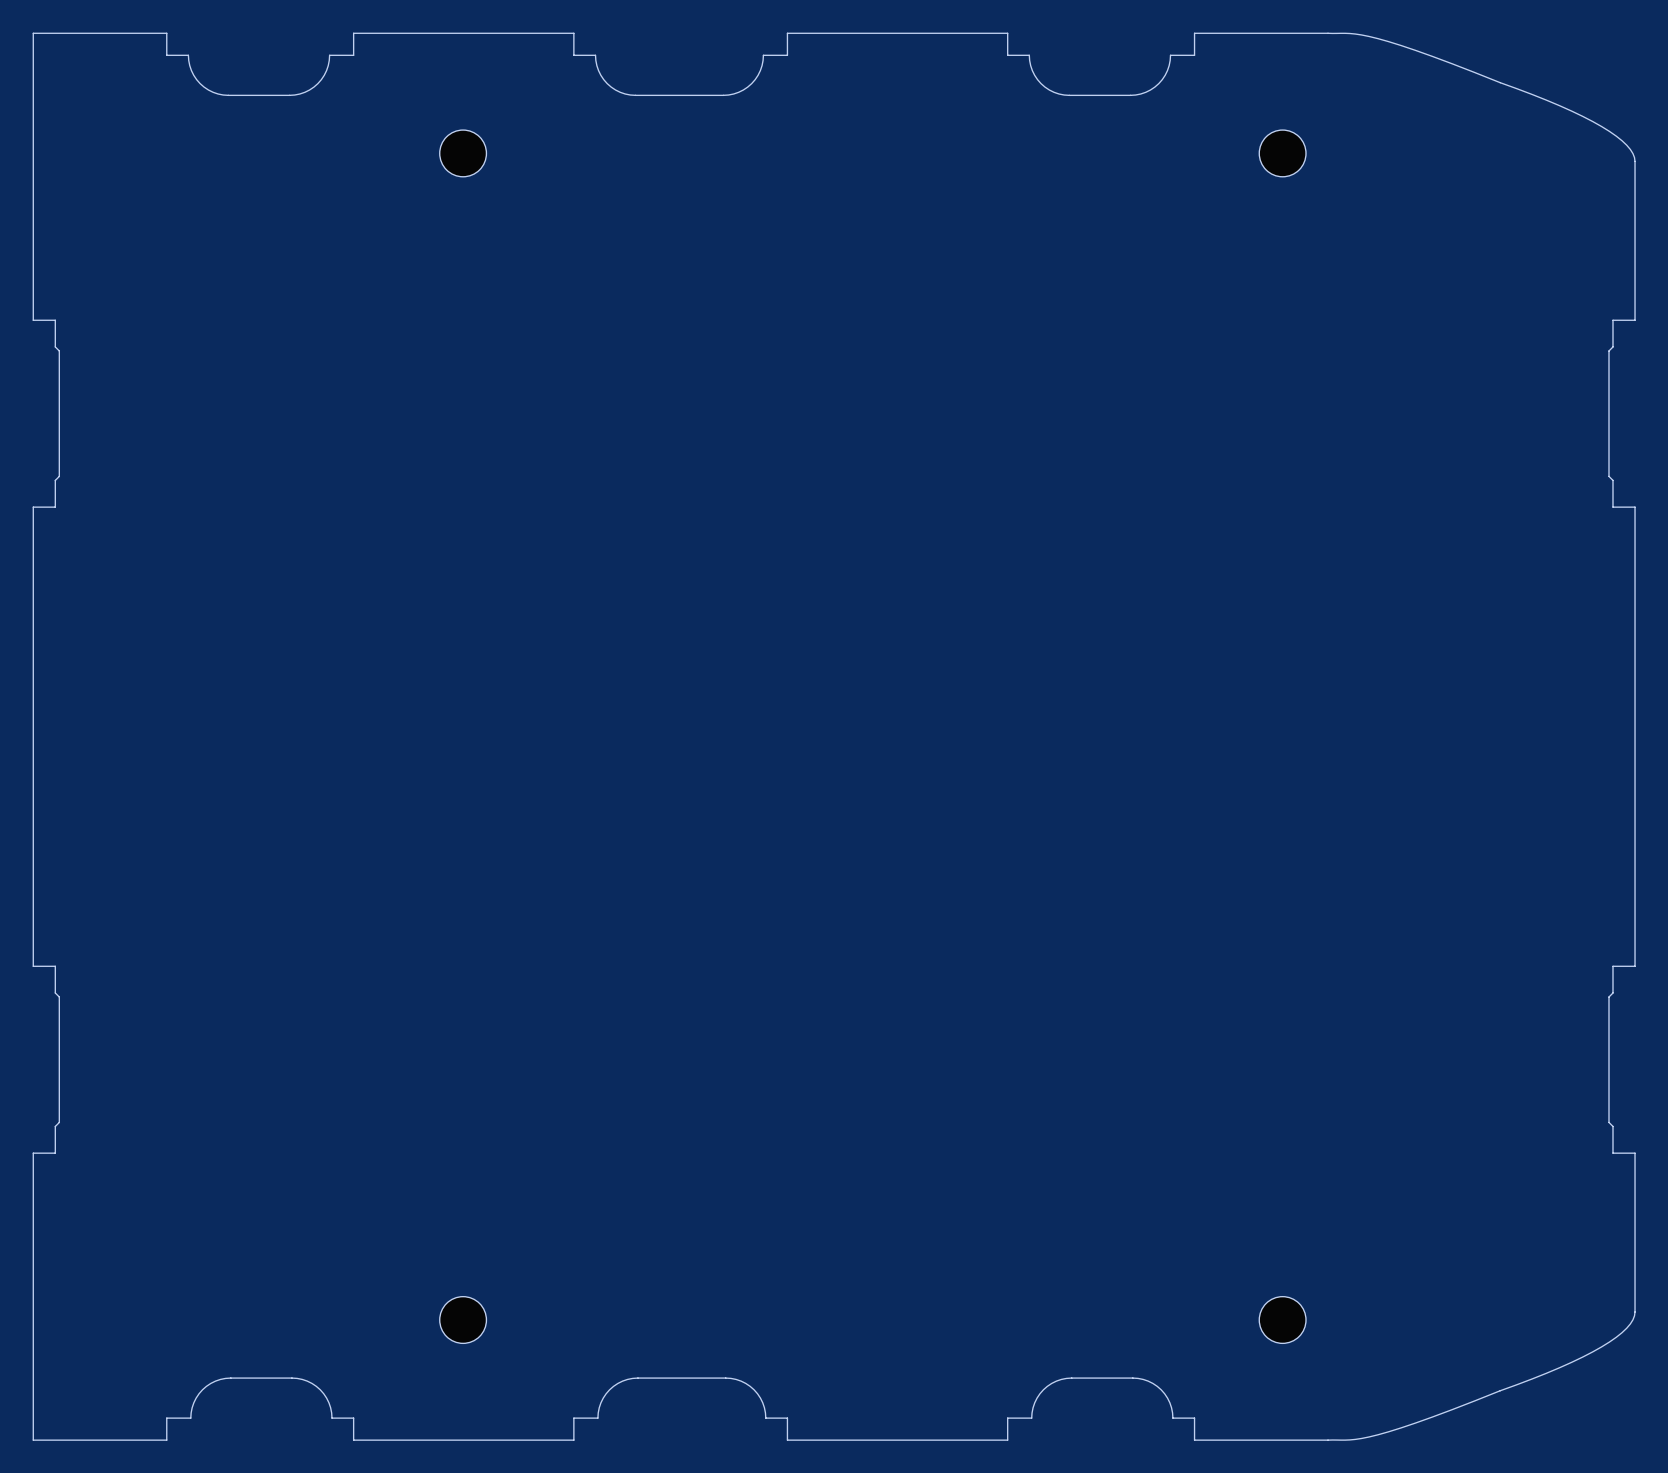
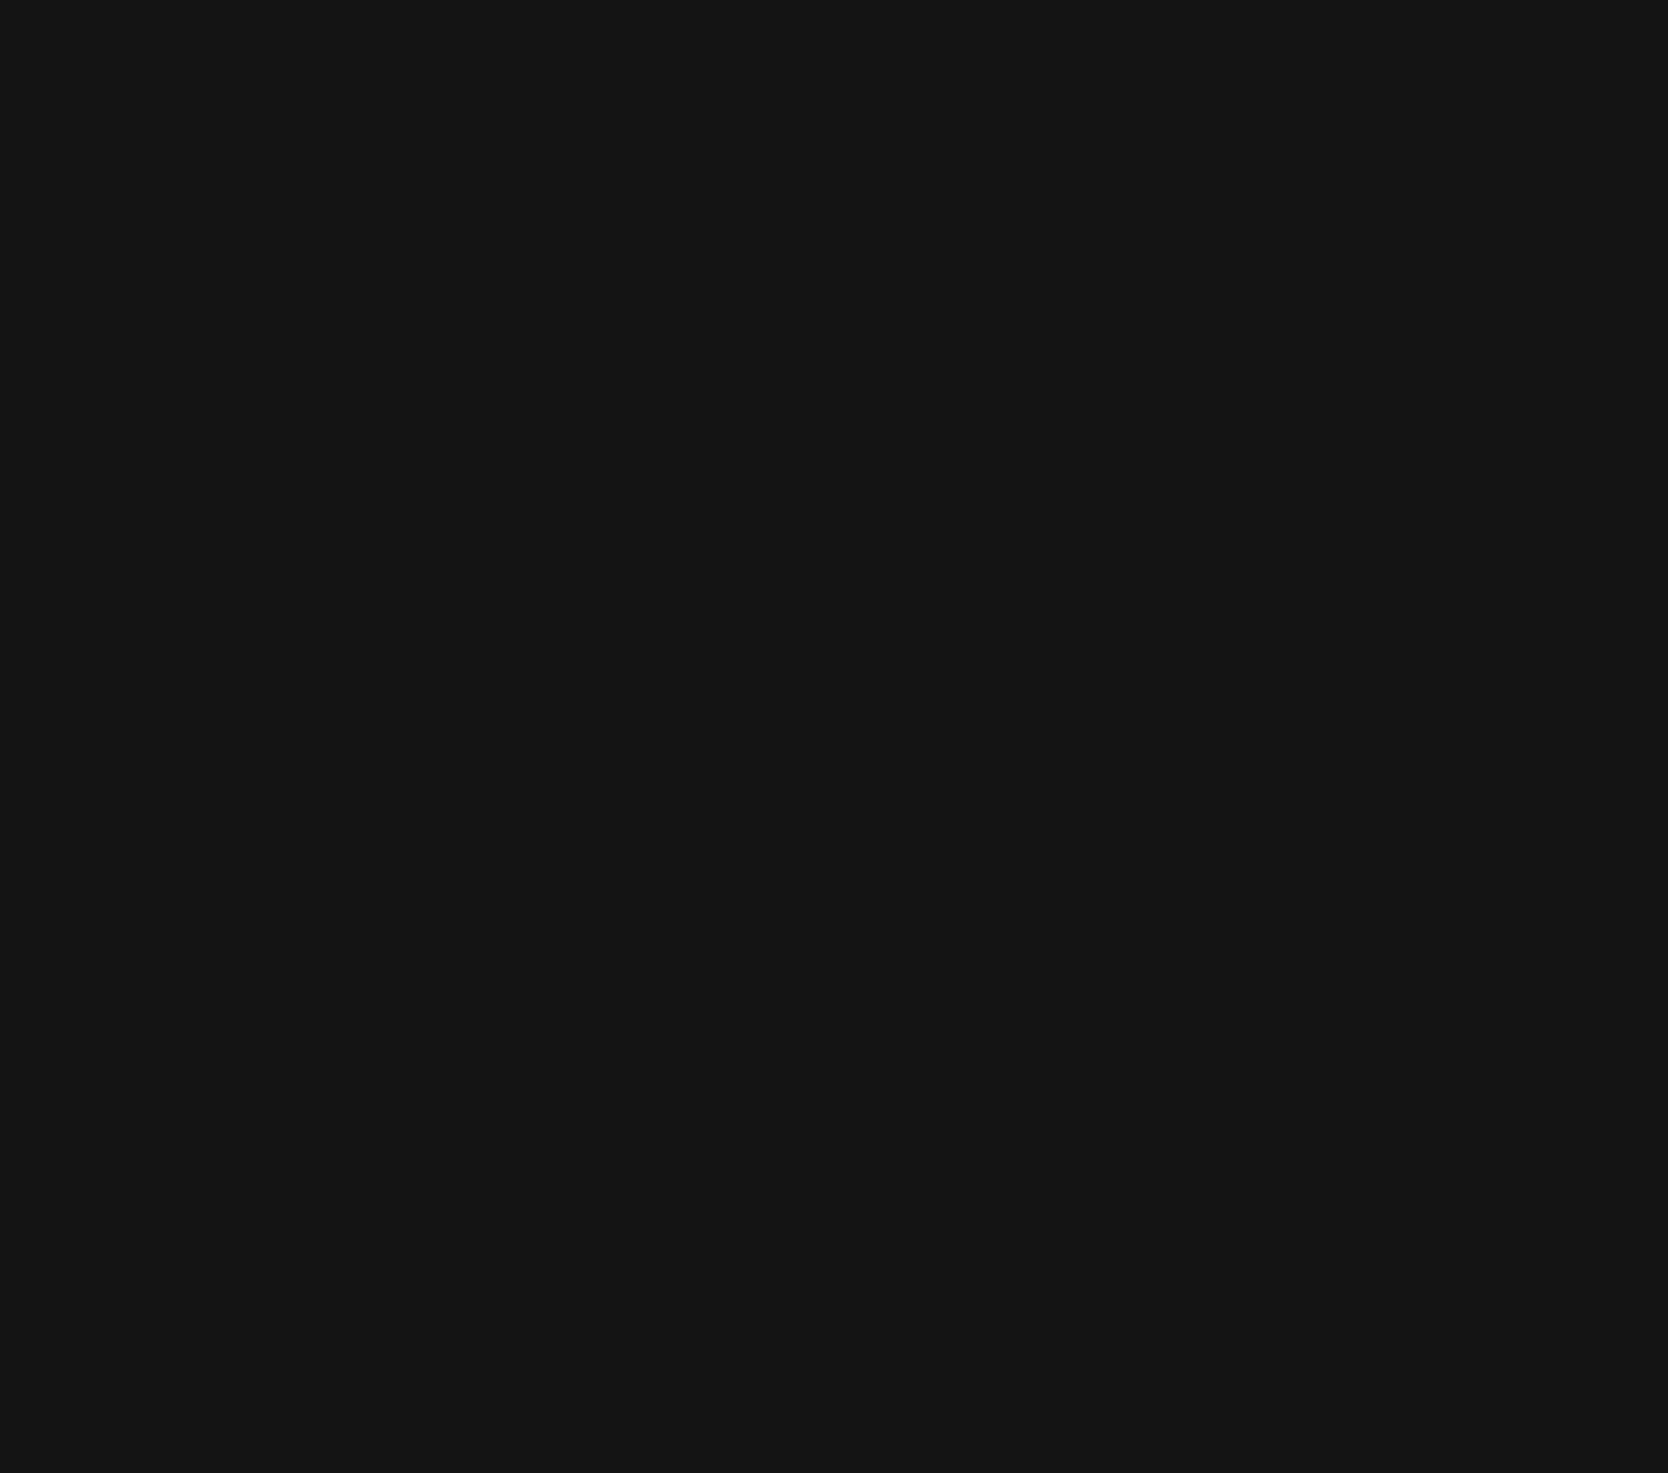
board edge: (33, 33) (33, 320) (55, 320) (55, 346) (59, 350) (59, 476) (55, 480) (55, 507) (33, 507) (33, 966) (55, 966) (55, 992) (59, 996) (59, 1122) (55, 1126) (55, 1153) (33, 1153) (33, 1440) (166, 1440) (166, 1418) (190, 1418) (193, 1402) (202, 1389) (215, 1381) (230, 1378) (297, 1378) (311, 1383) (326, 1398) (331, 1418) (353, 1418) (353, 1440) (573, 1440) (573, 1418) (597, 1418) (600, 1402) (609, 1389) (622, 1381) (637, 1378) (725, 1378) (741, 1381) (754, 1389) (760, 1398) (765, 1418) (787, 1418) (787, 1440) (1007, 1440) (1007, 1418) (1031, 1418) (1034, 1402) (1043, 1389) (1056, 1381) (1071, 1378) (1138, 1378) (1152, 1383) (1167, 1398) (1172, 1418) (1194, 1418) (1194, 1440) (1349, 1439) (1377, 1434) (1415, 1423) (1546, 1373) (1601, 1346) (1616, 1337) (1630, 1323) (1635, 1312) (1635, 1153) (1612, 1153) (1612, 1126) (1608, 1122) (1608, 996) (1612, 992) (1612, 966) (1635, 966) (1635, 507) (1612, 507) (1612, 480) (1608, 476) (1608, 350) (1612, 346) (1612, 320) (1635, 320) (1635, 161) (1630, 149) (1622, 140) (1582, 116) (1532, 94) (1400, 45) (1369, 36) (1349, 33) (1194, 33) (1194, 55) (1170, 55) (1165, 75) (1150, 89) (1135, 95) (1069, 95) (1054, 92) (1041, 83) (1032, 70) (1029, 55) (1007, 55) (1007, 33) (787, 33) (787, 55) (763, 55) (762, 65) (755, 79) (738, 92) (723, 95) (635, 95) (620, 92) (607, 83) (598, 70) (595, 55) (573, 55) (573, 33) (353, 33) (353, 55) (329, 55) (324, 75) (309, 89) (294, 95) (228, 95) (213, 92) (200, 83) (191, 70) (188, 55) (166, 55) (166, 33) (33, 33) -> none
part: (463, 153) -> none
part: (1282, 153) -> none
part: (463, 1320) -> none
part: (1282, 1320) -> none

